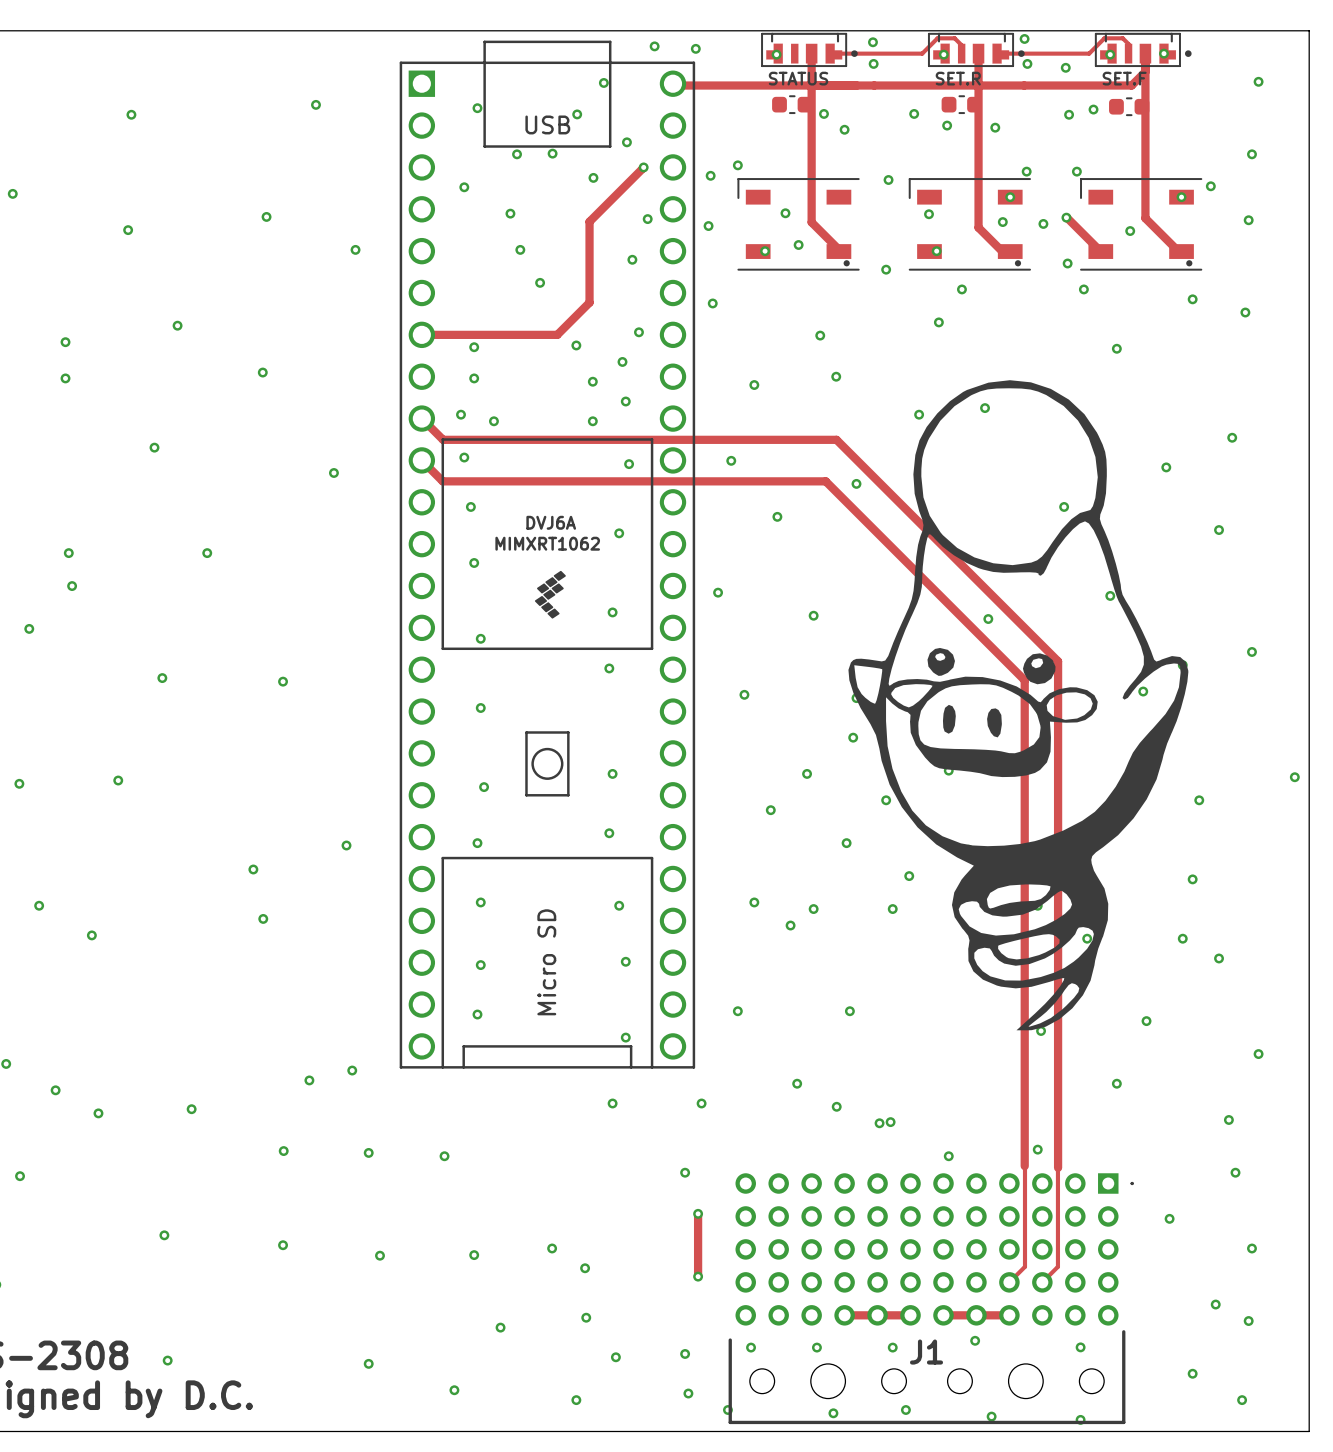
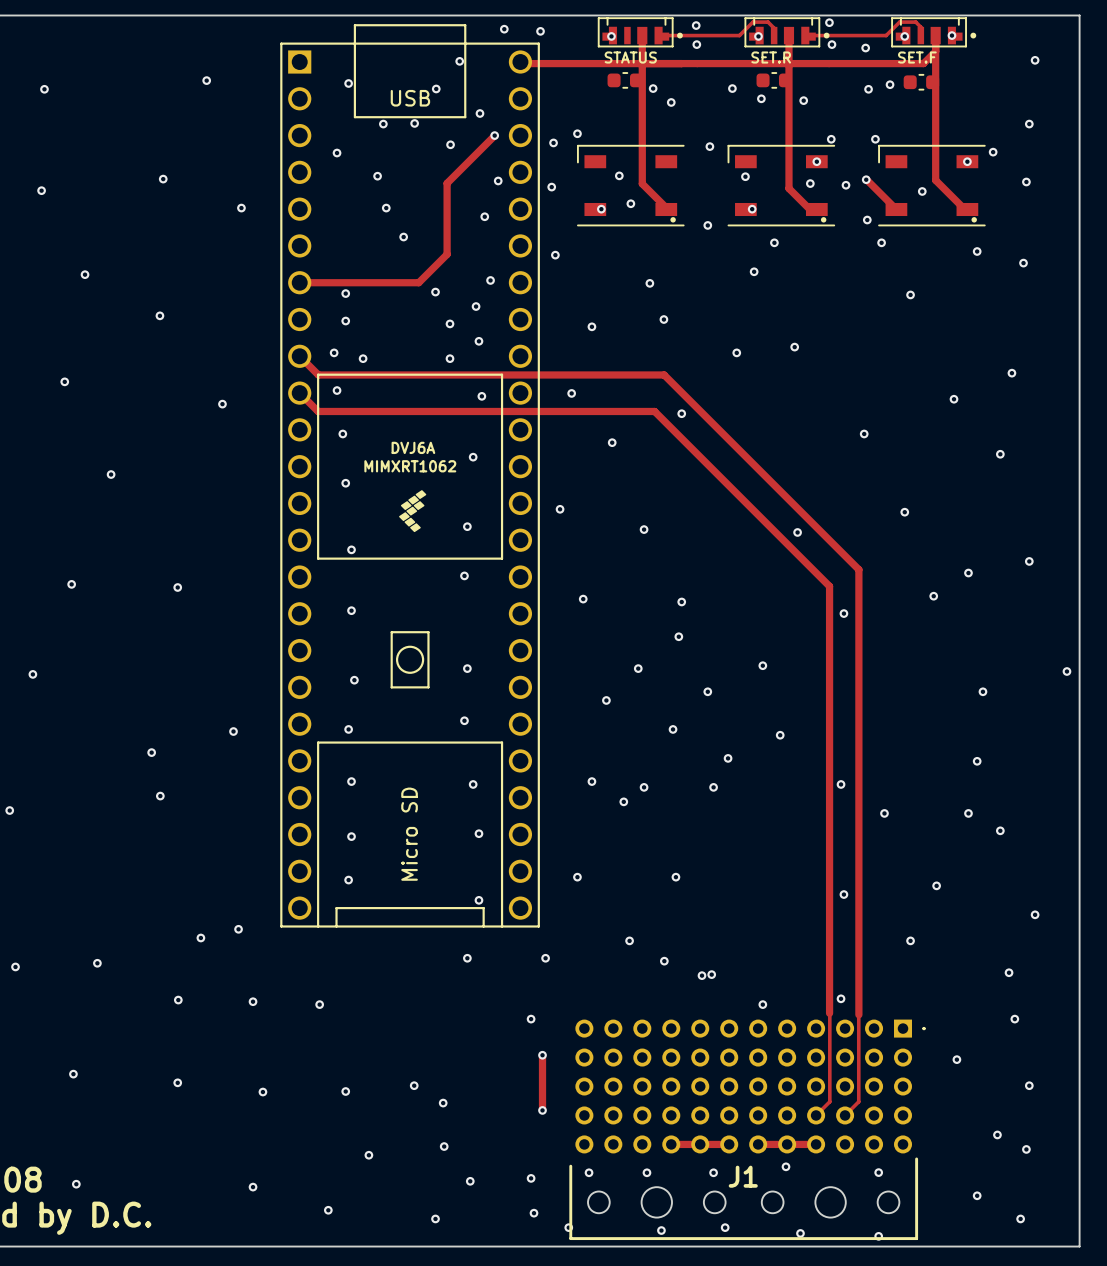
drawing: [848, 380, 1189, 1031] -> none

